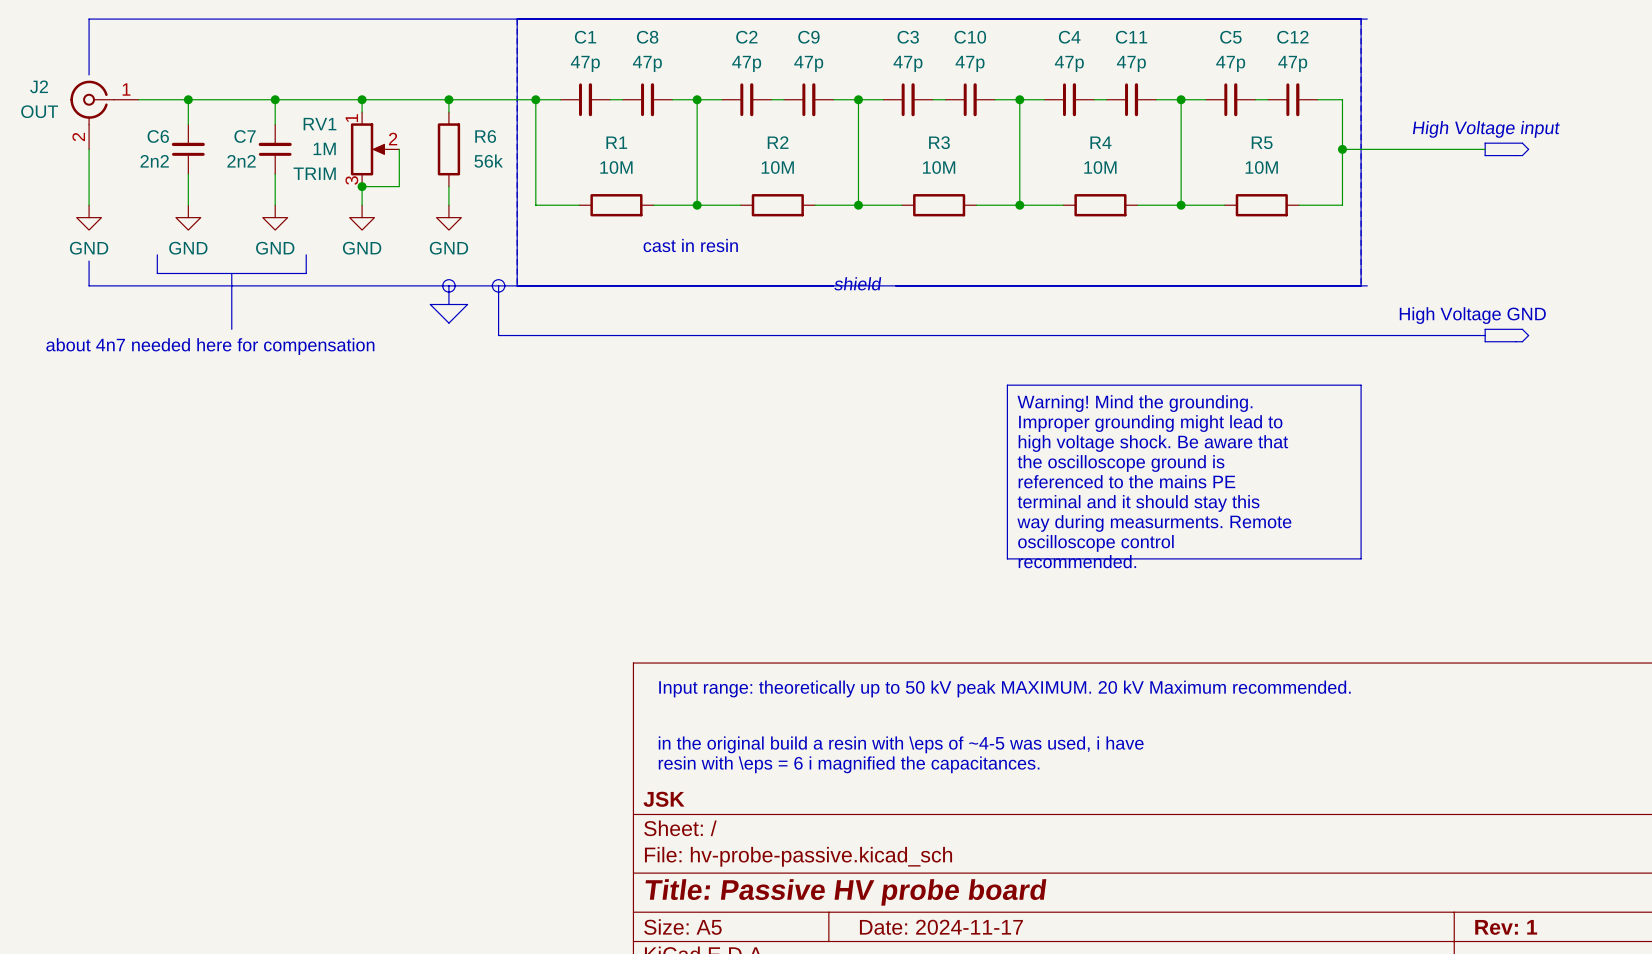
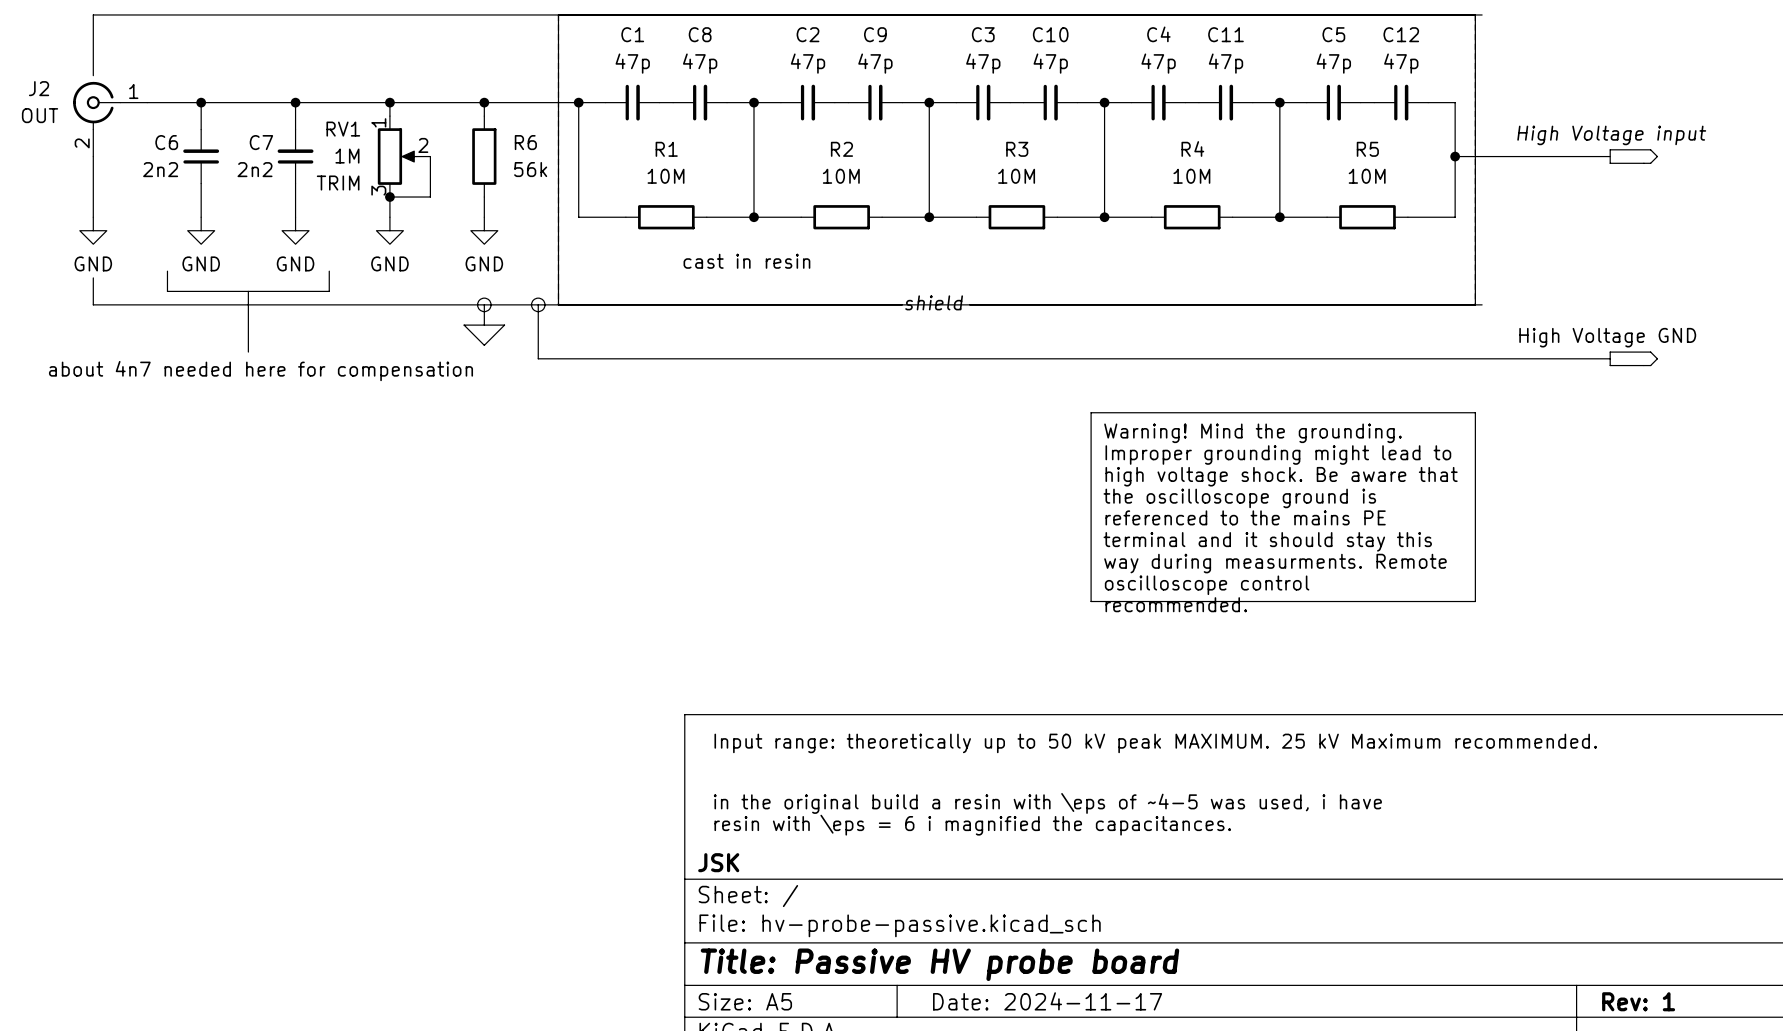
text: Input range: theoretically up to 50 kV peak MAXIMUM. 20 kV Maximum recommended. (1004, 688) -> Input range: theoretically up to 50 kV peak MAXIMUM. 25 kV Maximum recommended. (1155, 743)

